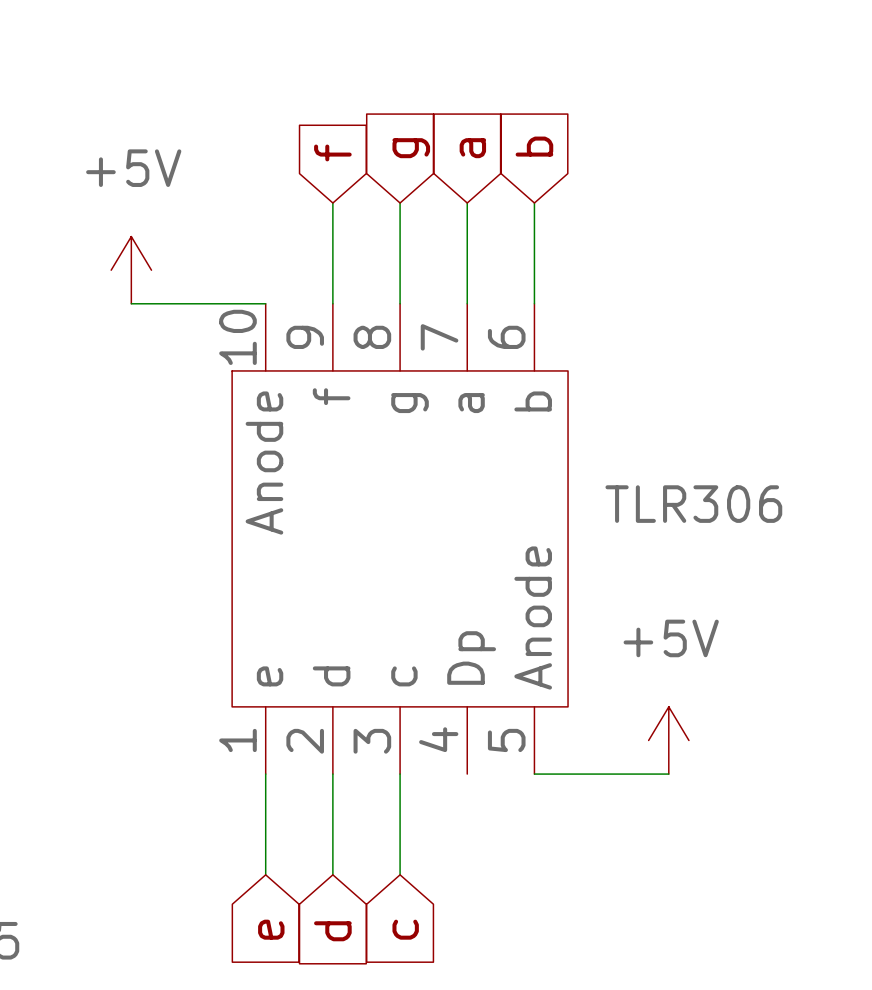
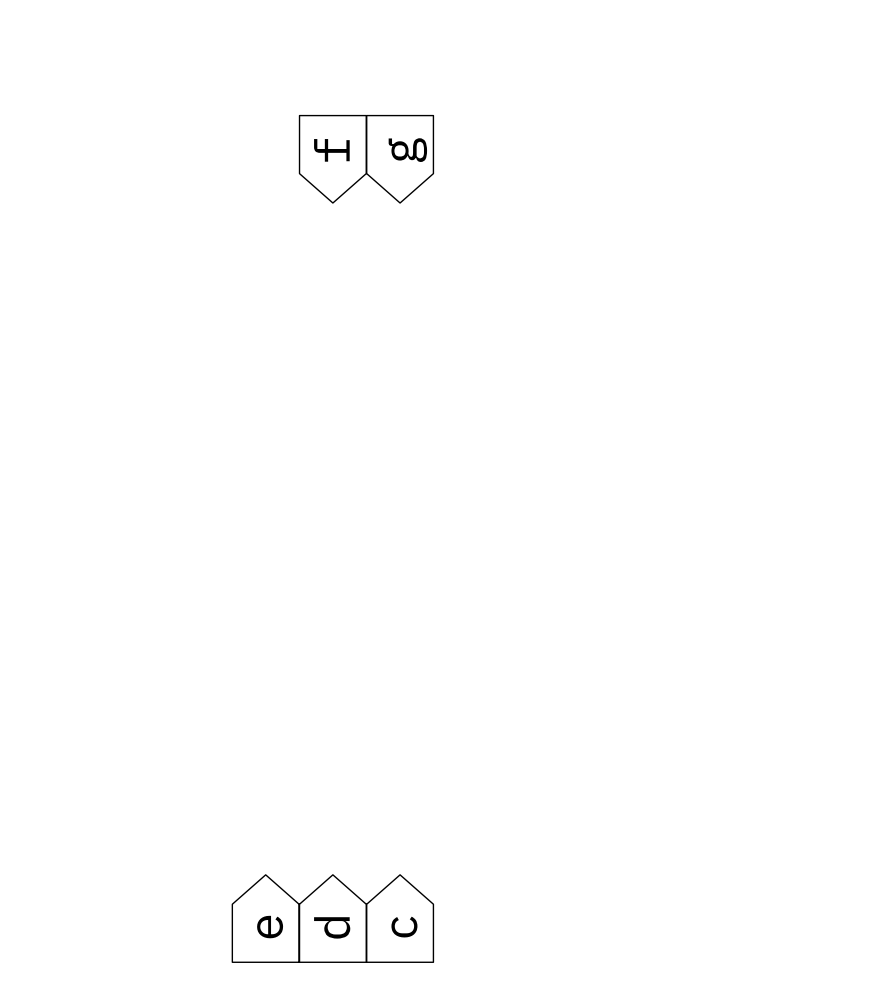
global label: b (534, 146) -> none
global label: a (472, 148) -> none
wire: (332, 203) (332, 303) -> none
wire: (400, 203) (400, 303) -> none
wire: (467, 203) (467, 303) -> none
wire: (534, 203) (534, 303) -> none
power symbol: +5V (131, 270) -> none
wire: (131, 303) (265, 303) -> none
TLR306: (400, 538) -> none
power symbol: +5V (668, 740) -> none
wire: (265, 774) (265, 874) -> none
wire: (332, 774) (332, 874) -> none
wire: (400, 774) (400, 874) -> none
wire: (534, 774) (668, 774) -> none

